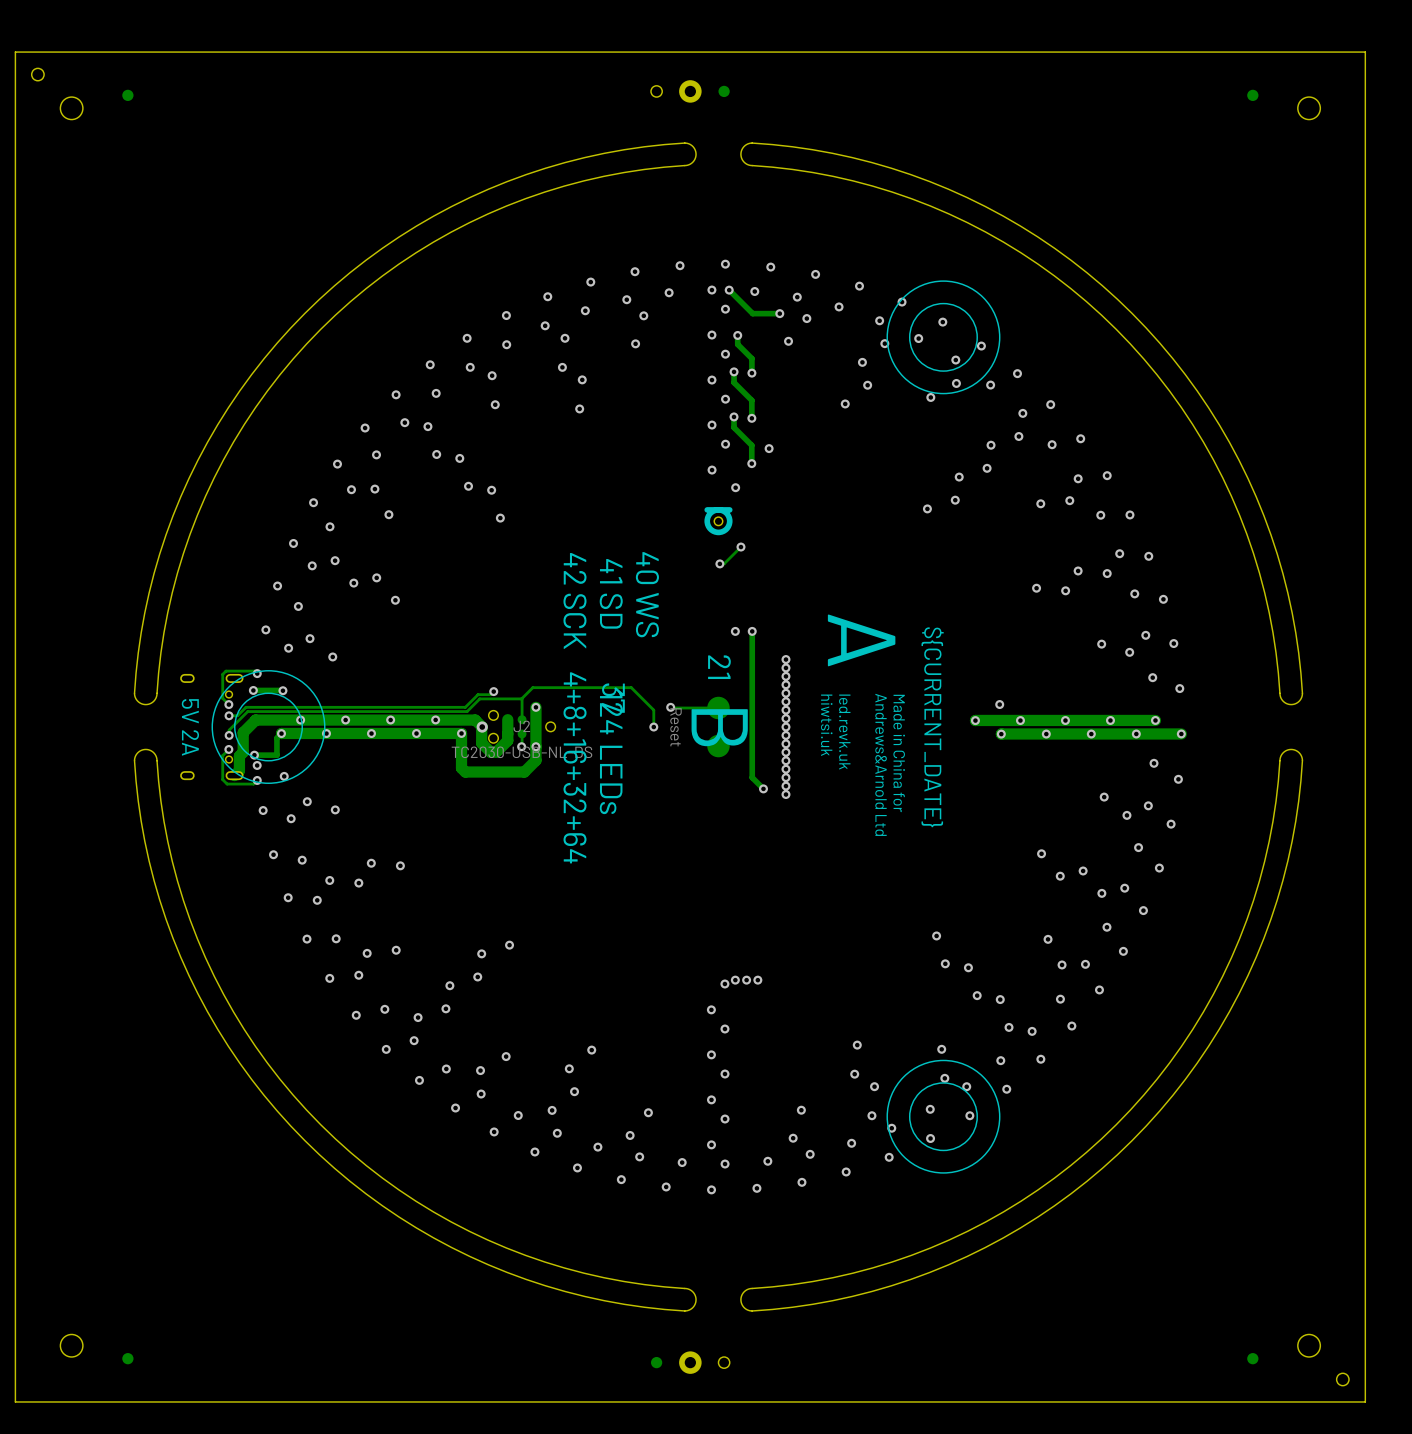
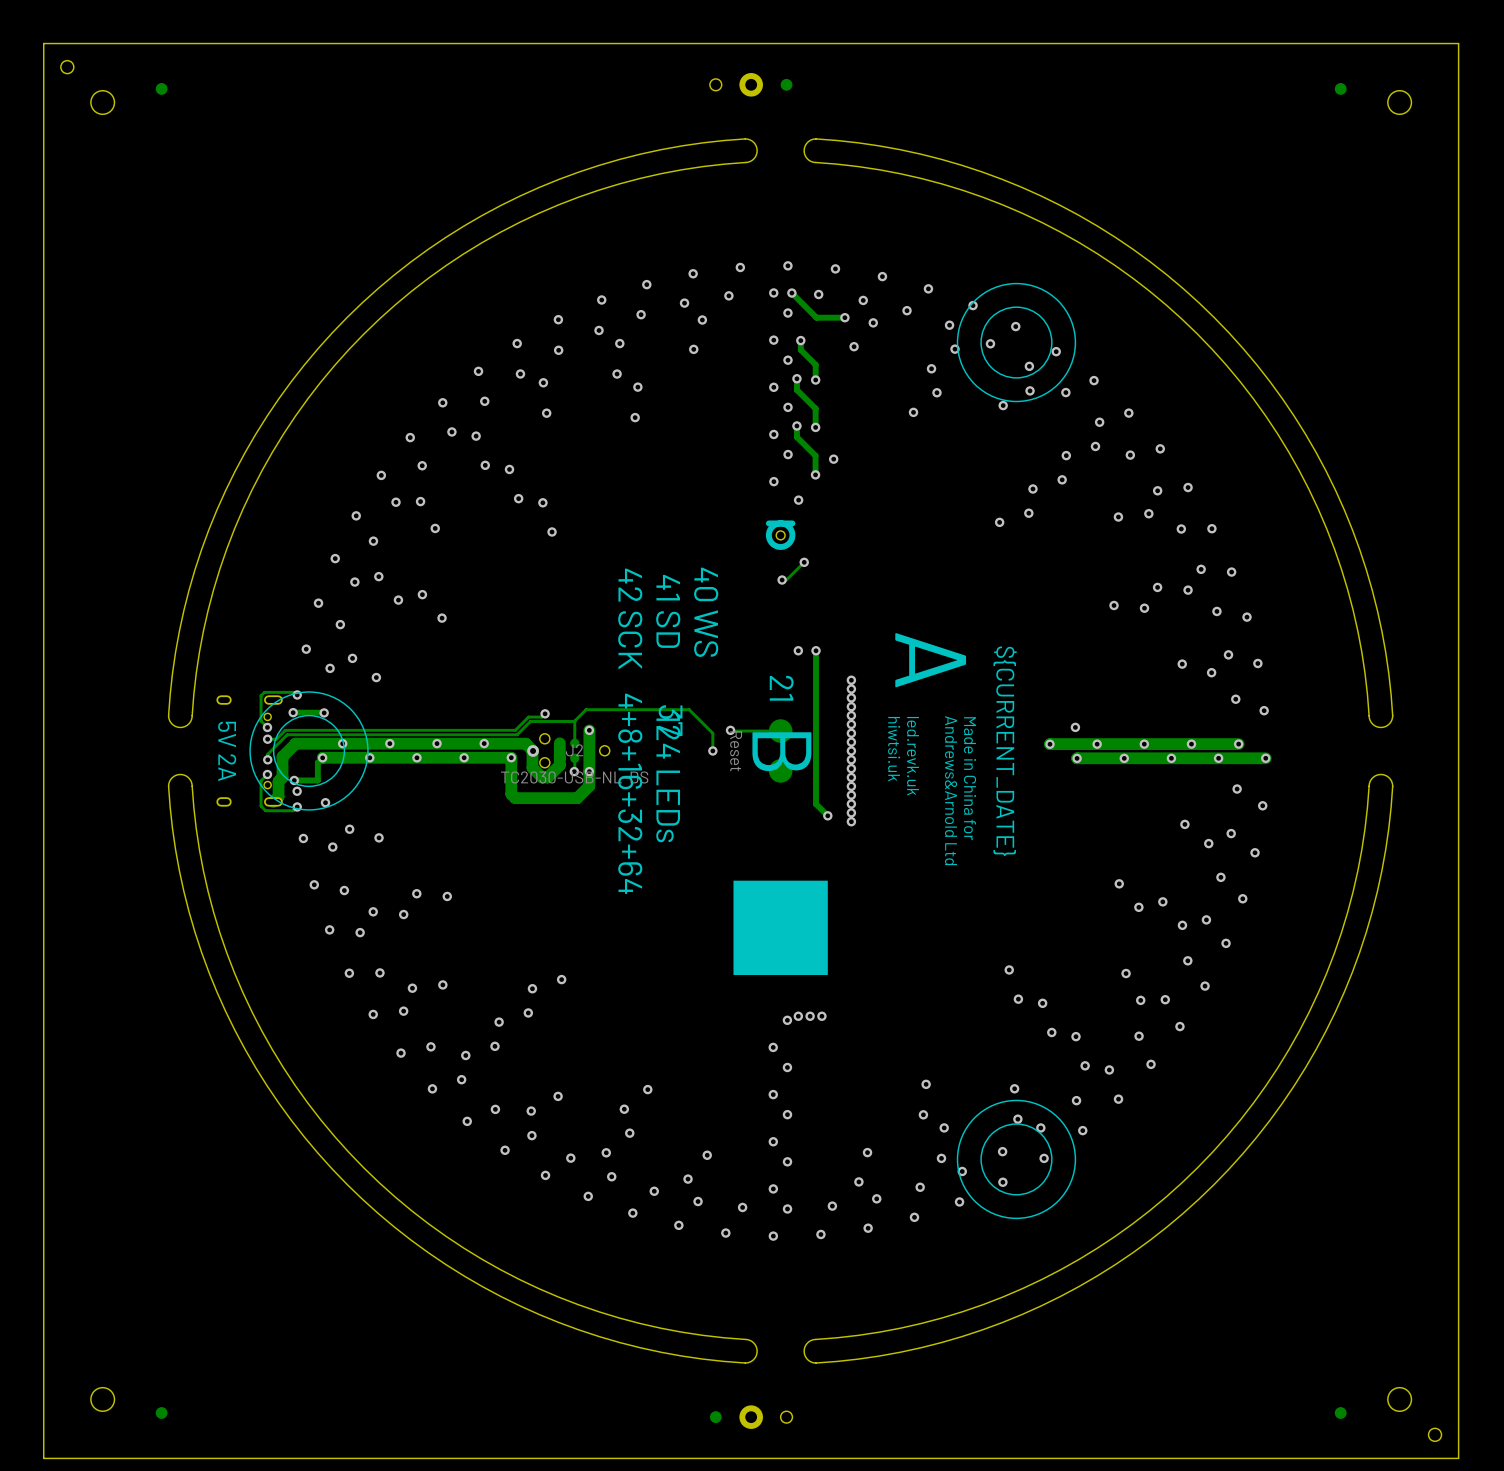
drawing: none -> [733, 880, 828, 975]

